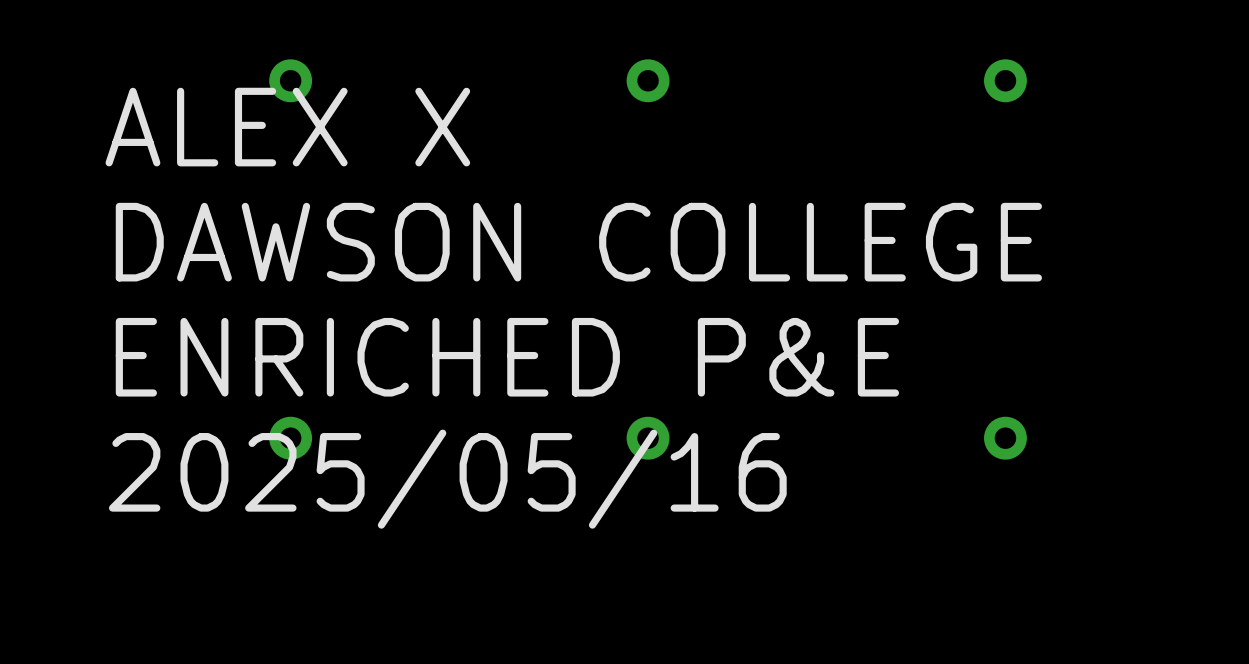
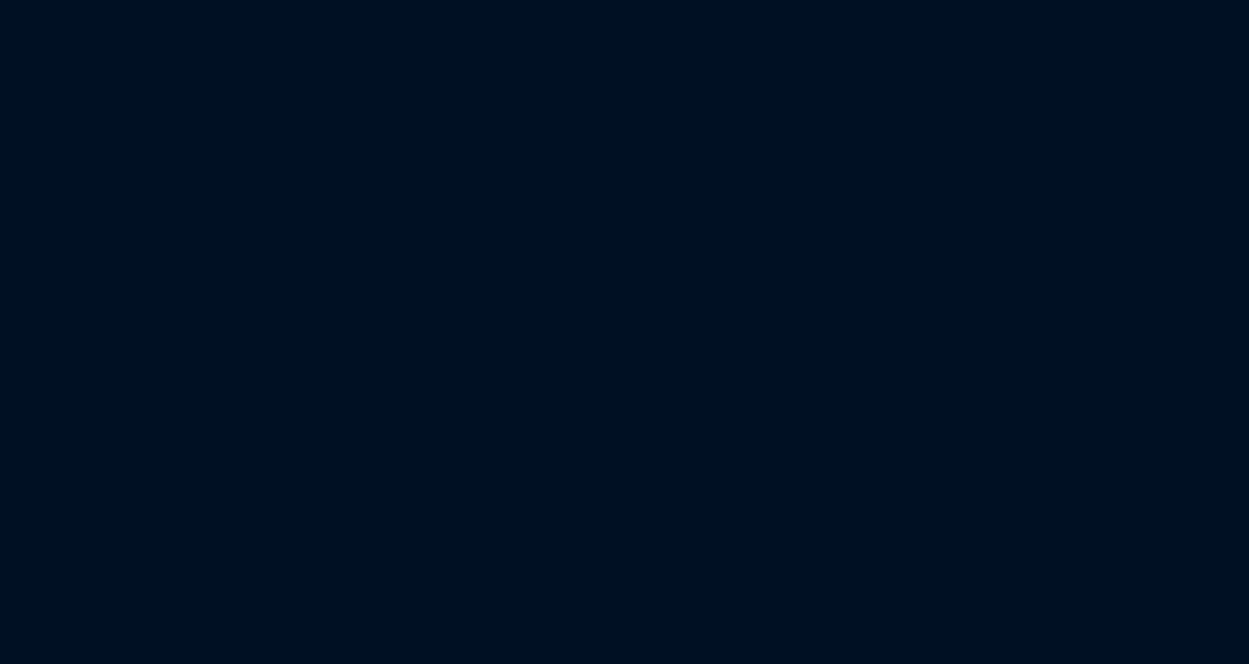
via: (290, 80) -> none
via: (648, 80) -> none
via: (1005, 80) -> none
text: ALEX X (287, 127) -> none
text: DAWSON COLLEGE (578, 242) -> none
text: ENRICHED P&E (507, 357) -> none
via: (290, 438) -> none
via: (648, 438) -> none
via: (1005, 438) -> none
text: 2025/05/16 (447, 479) -> none

